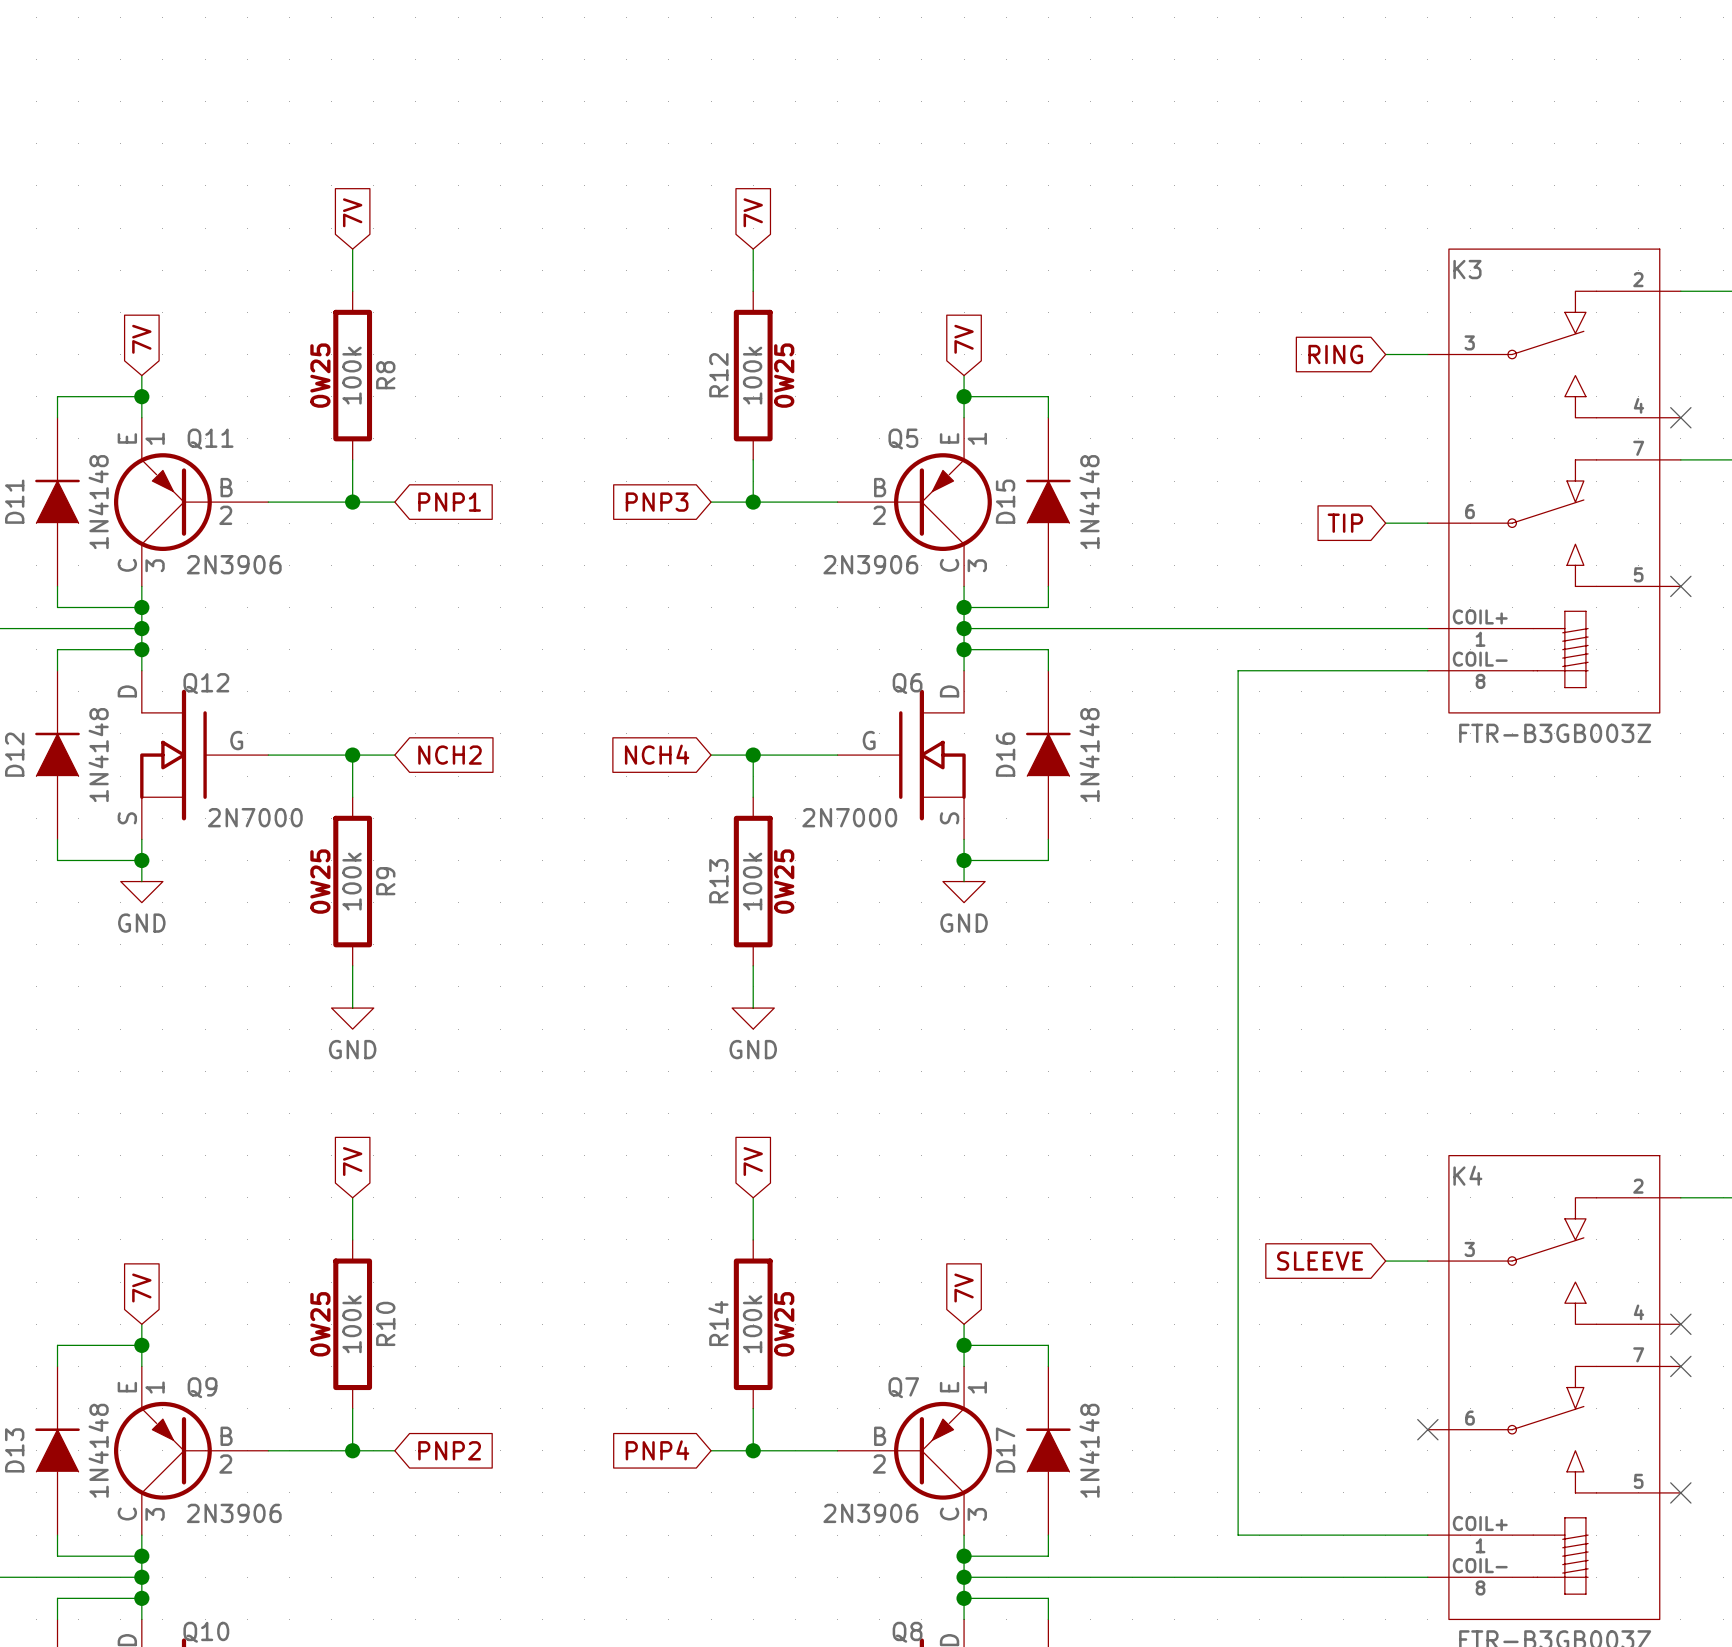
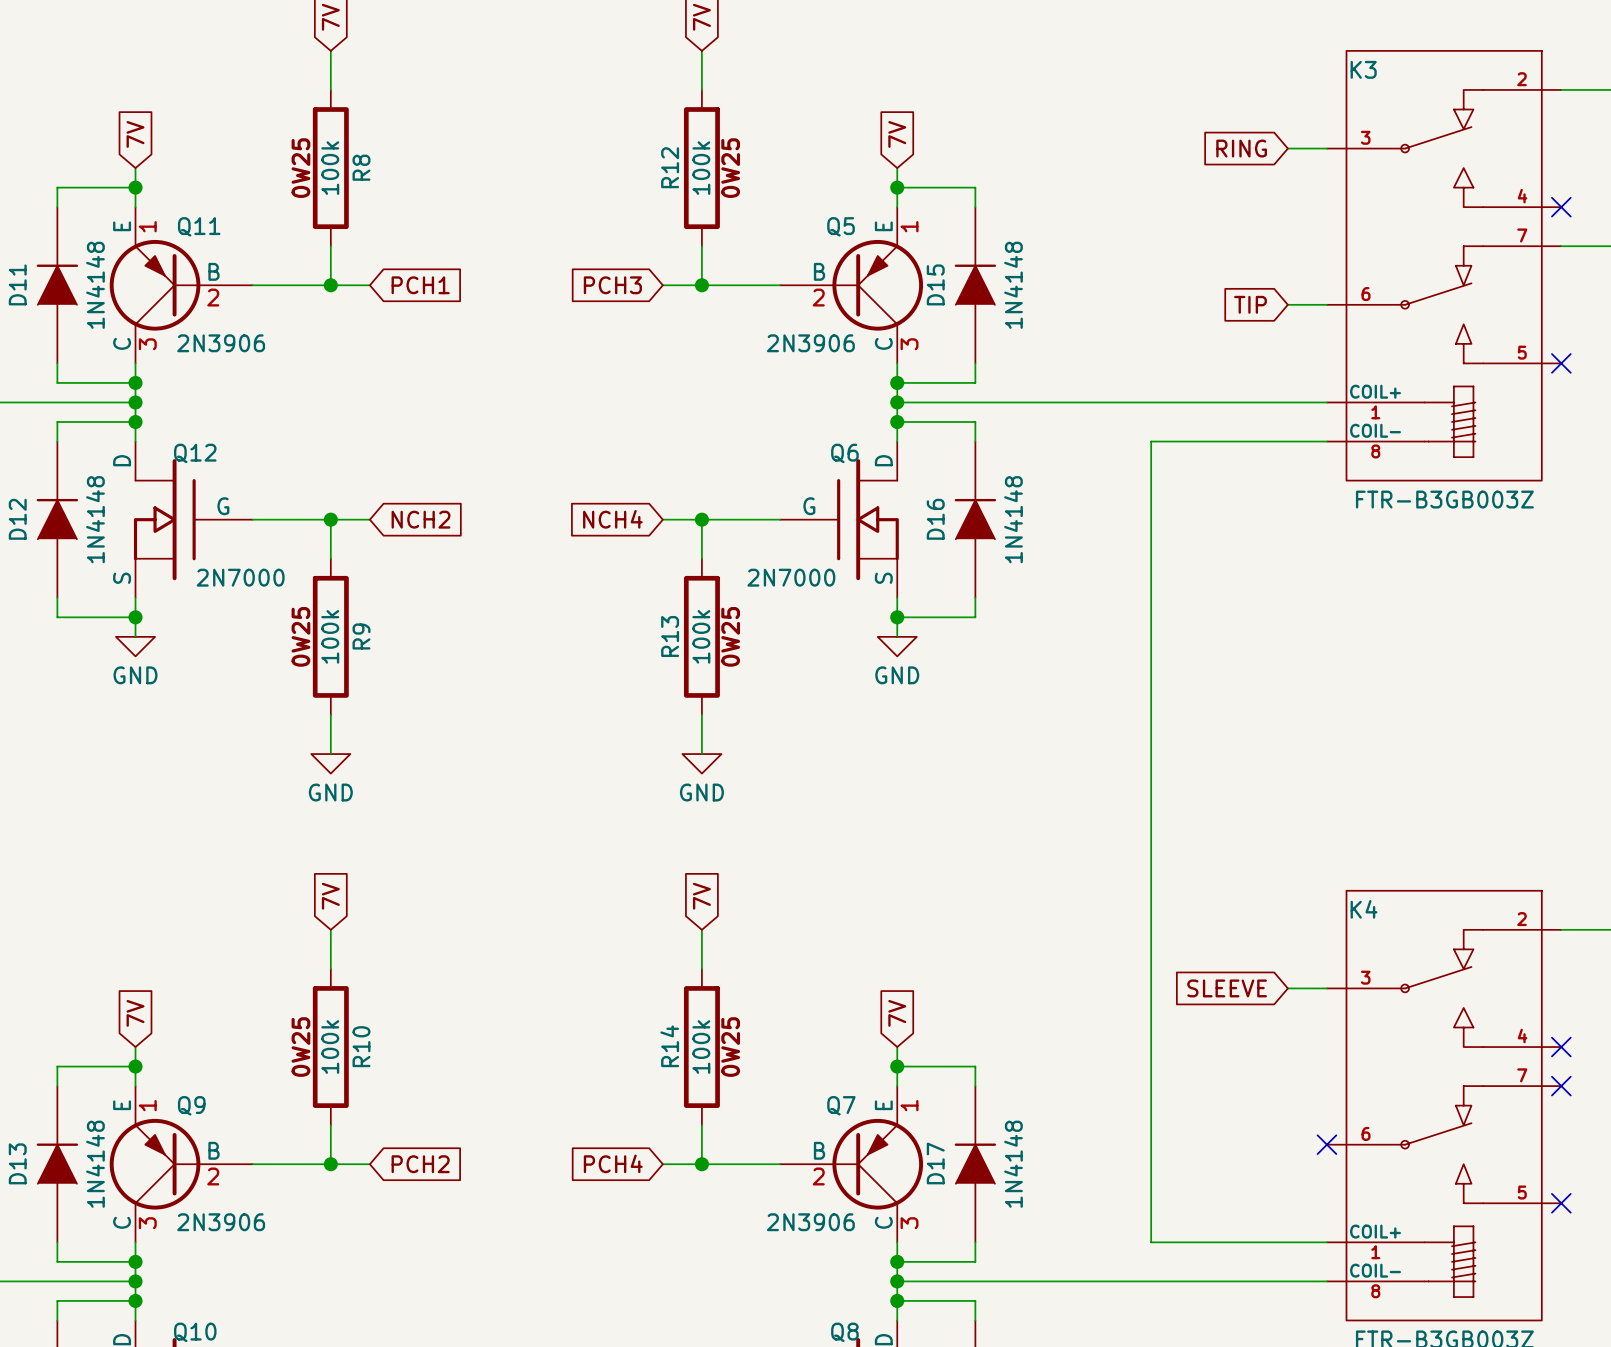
global label: PNP1 (449, 502) -> PCH1 (420, 285)
global label: PNP3 (657, 502) -> PCH3 (612, 285)
global label: PNP2 (449, 1450) -> PCH2 (420, 1164)
global label: PNP4 (657, 1450) -> PCH4 (613, 1163)

